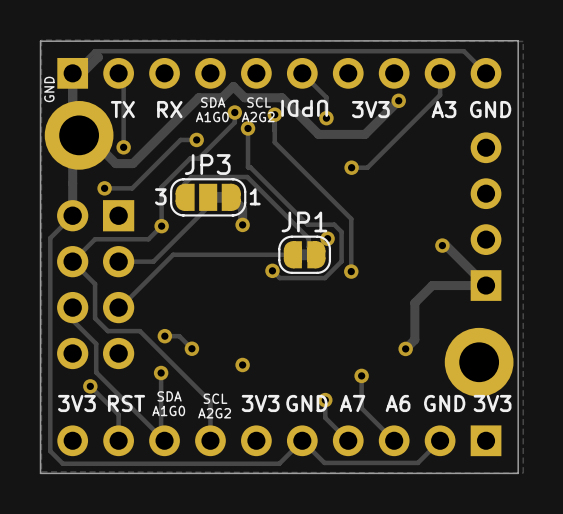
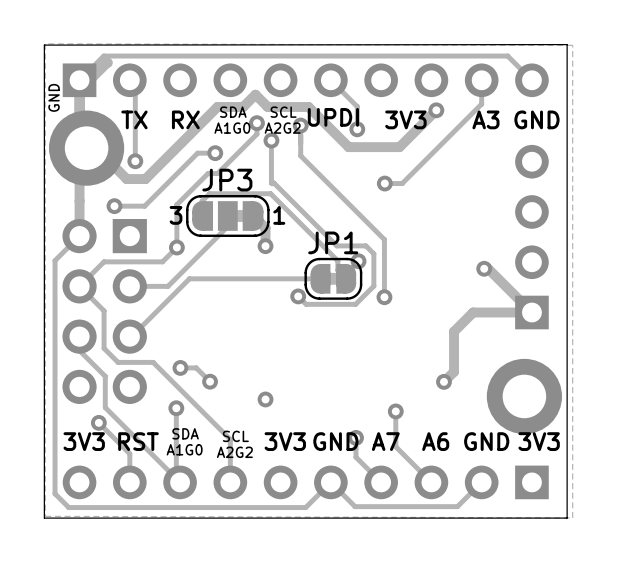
text rotation: 0° (304, 108) -> 180° (333, 117)

